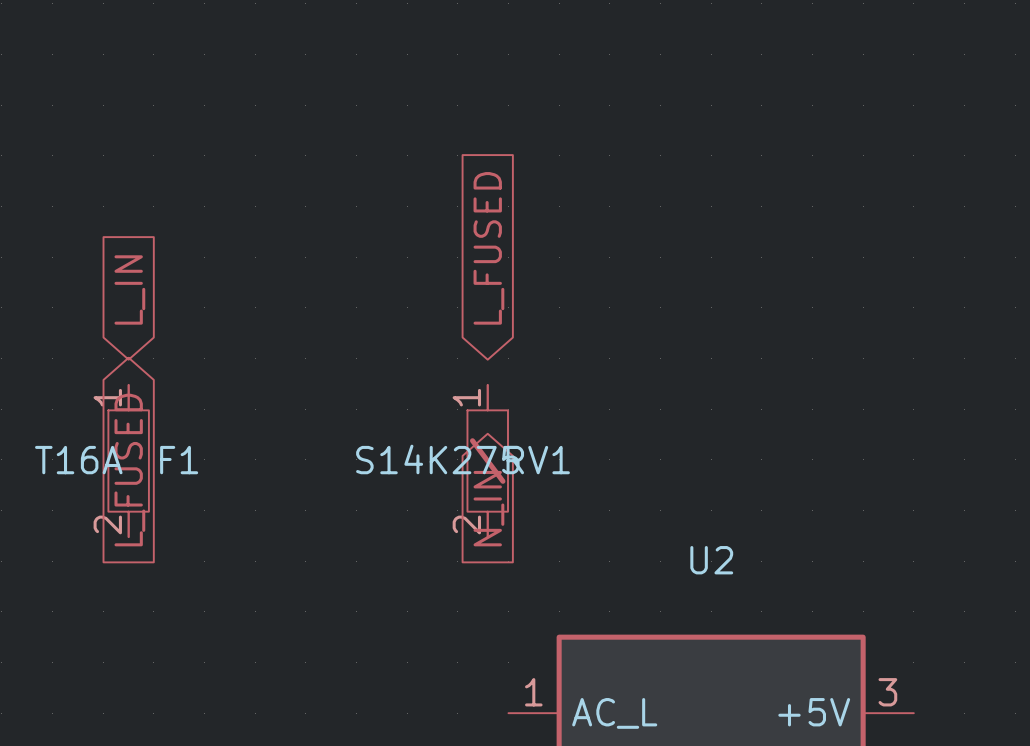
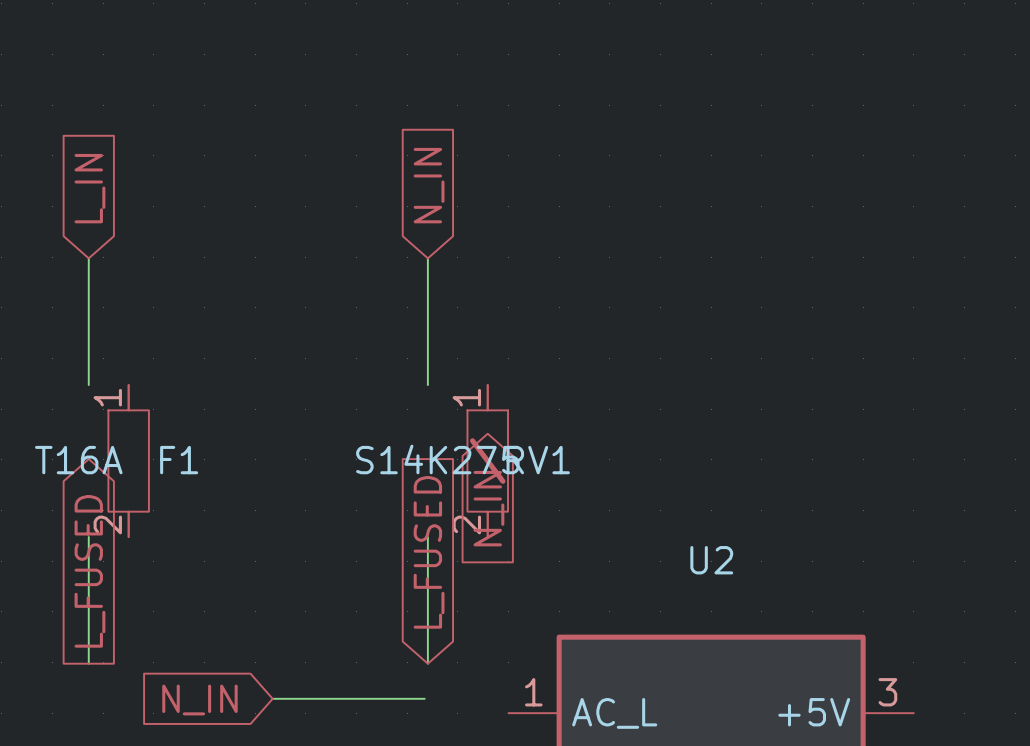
global label: none -> N_IN (429, 185)
global label: L_FUSED (488, 248) -> none
wire: none -> (88, 258) (88, 385)
wire: none -> (427, 258) (427, 385)
global label position: L_IN (129, 289) -> L_IN (89, 188)
global label position: L_FUSED (129, 470) -> L_FUSED (89, 571)
wire: none -> (88, 537) (88, 663)
wire: none -> (427, 537) (427, 663)
global label: none -> L_FUSED (429, 552)
wire: none -> (272, 698) (424, 698)
global label: none -> N_IN (199, 700)

